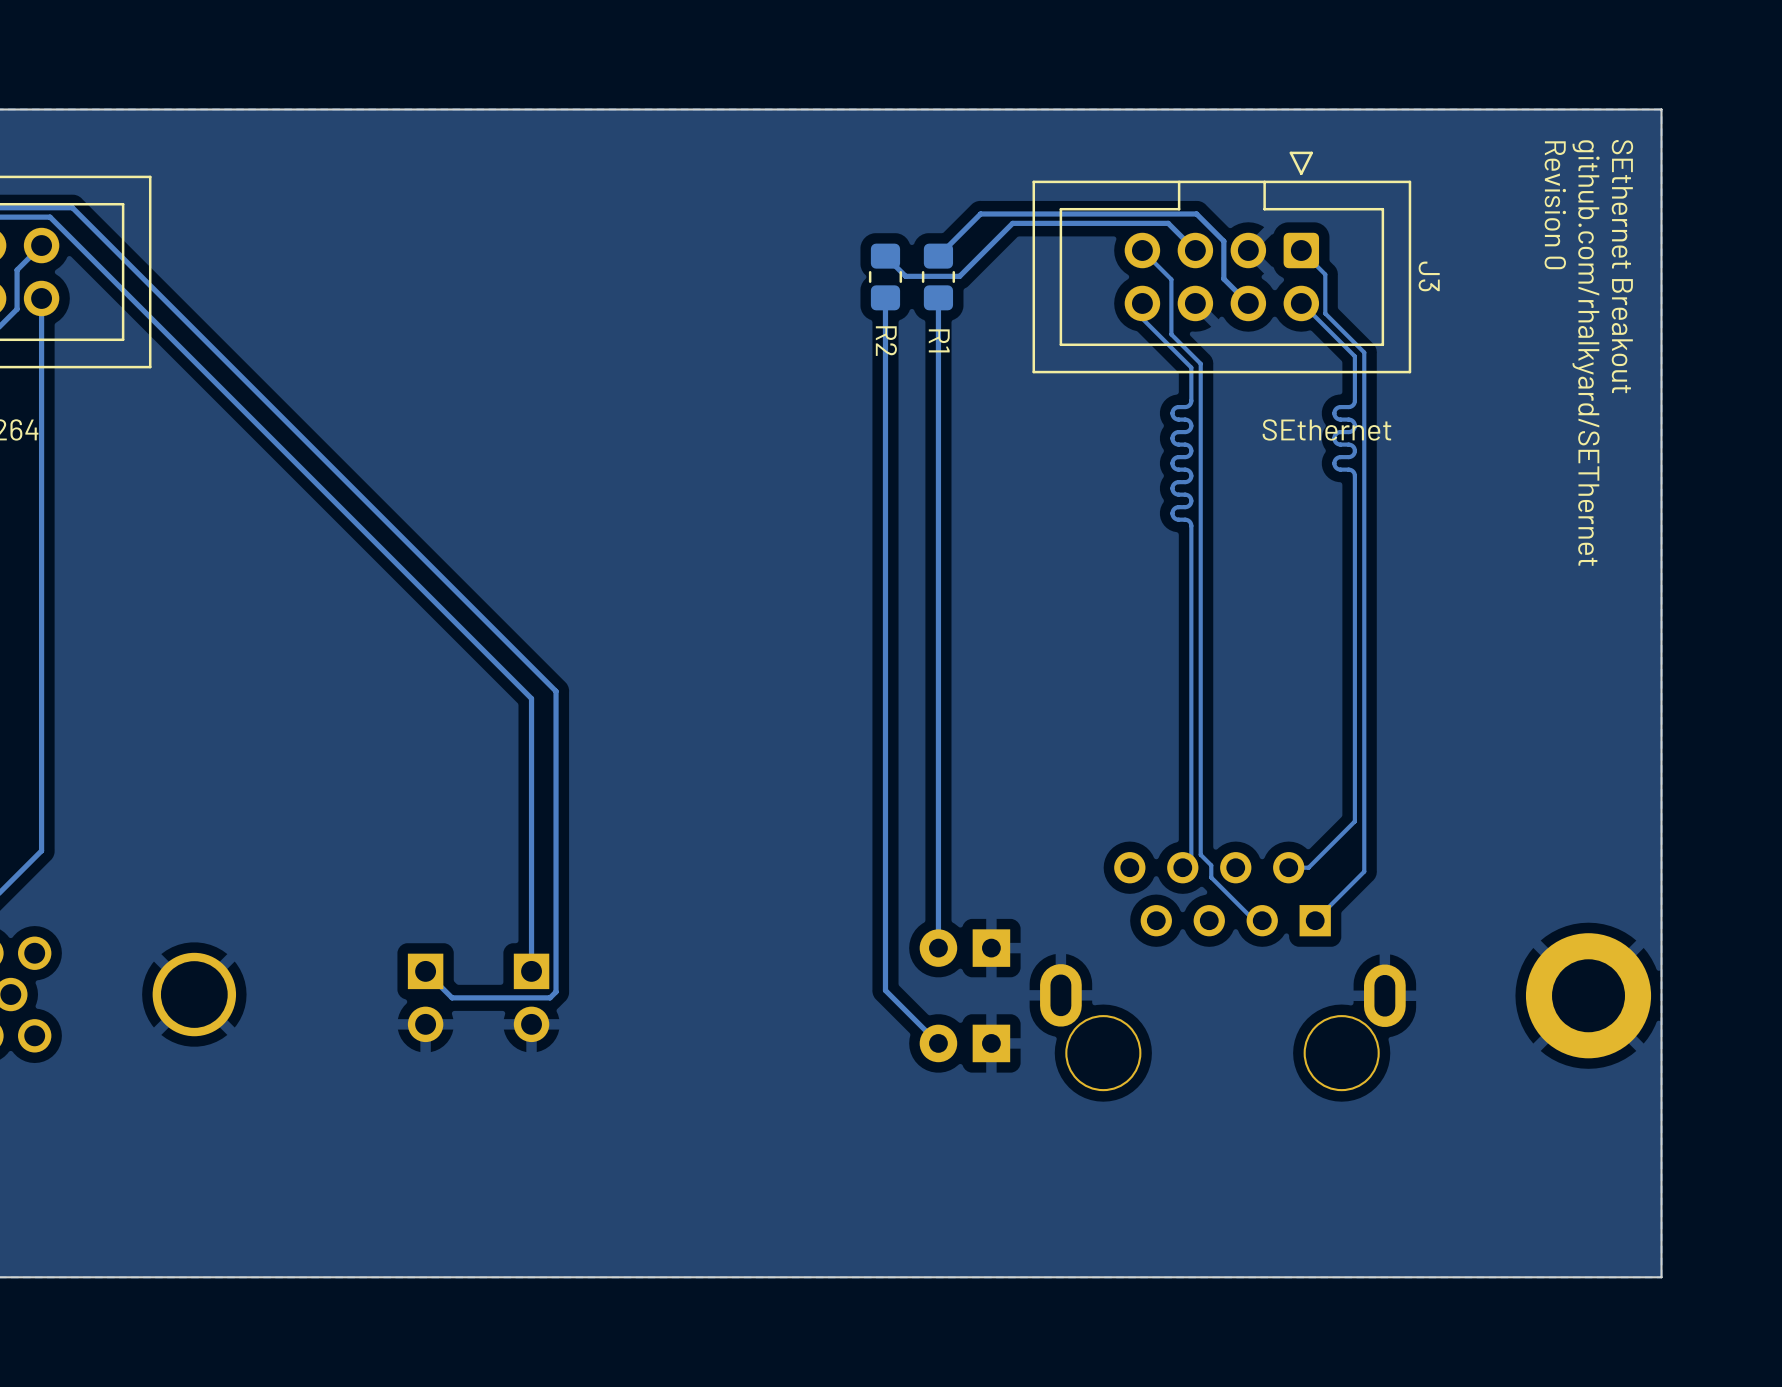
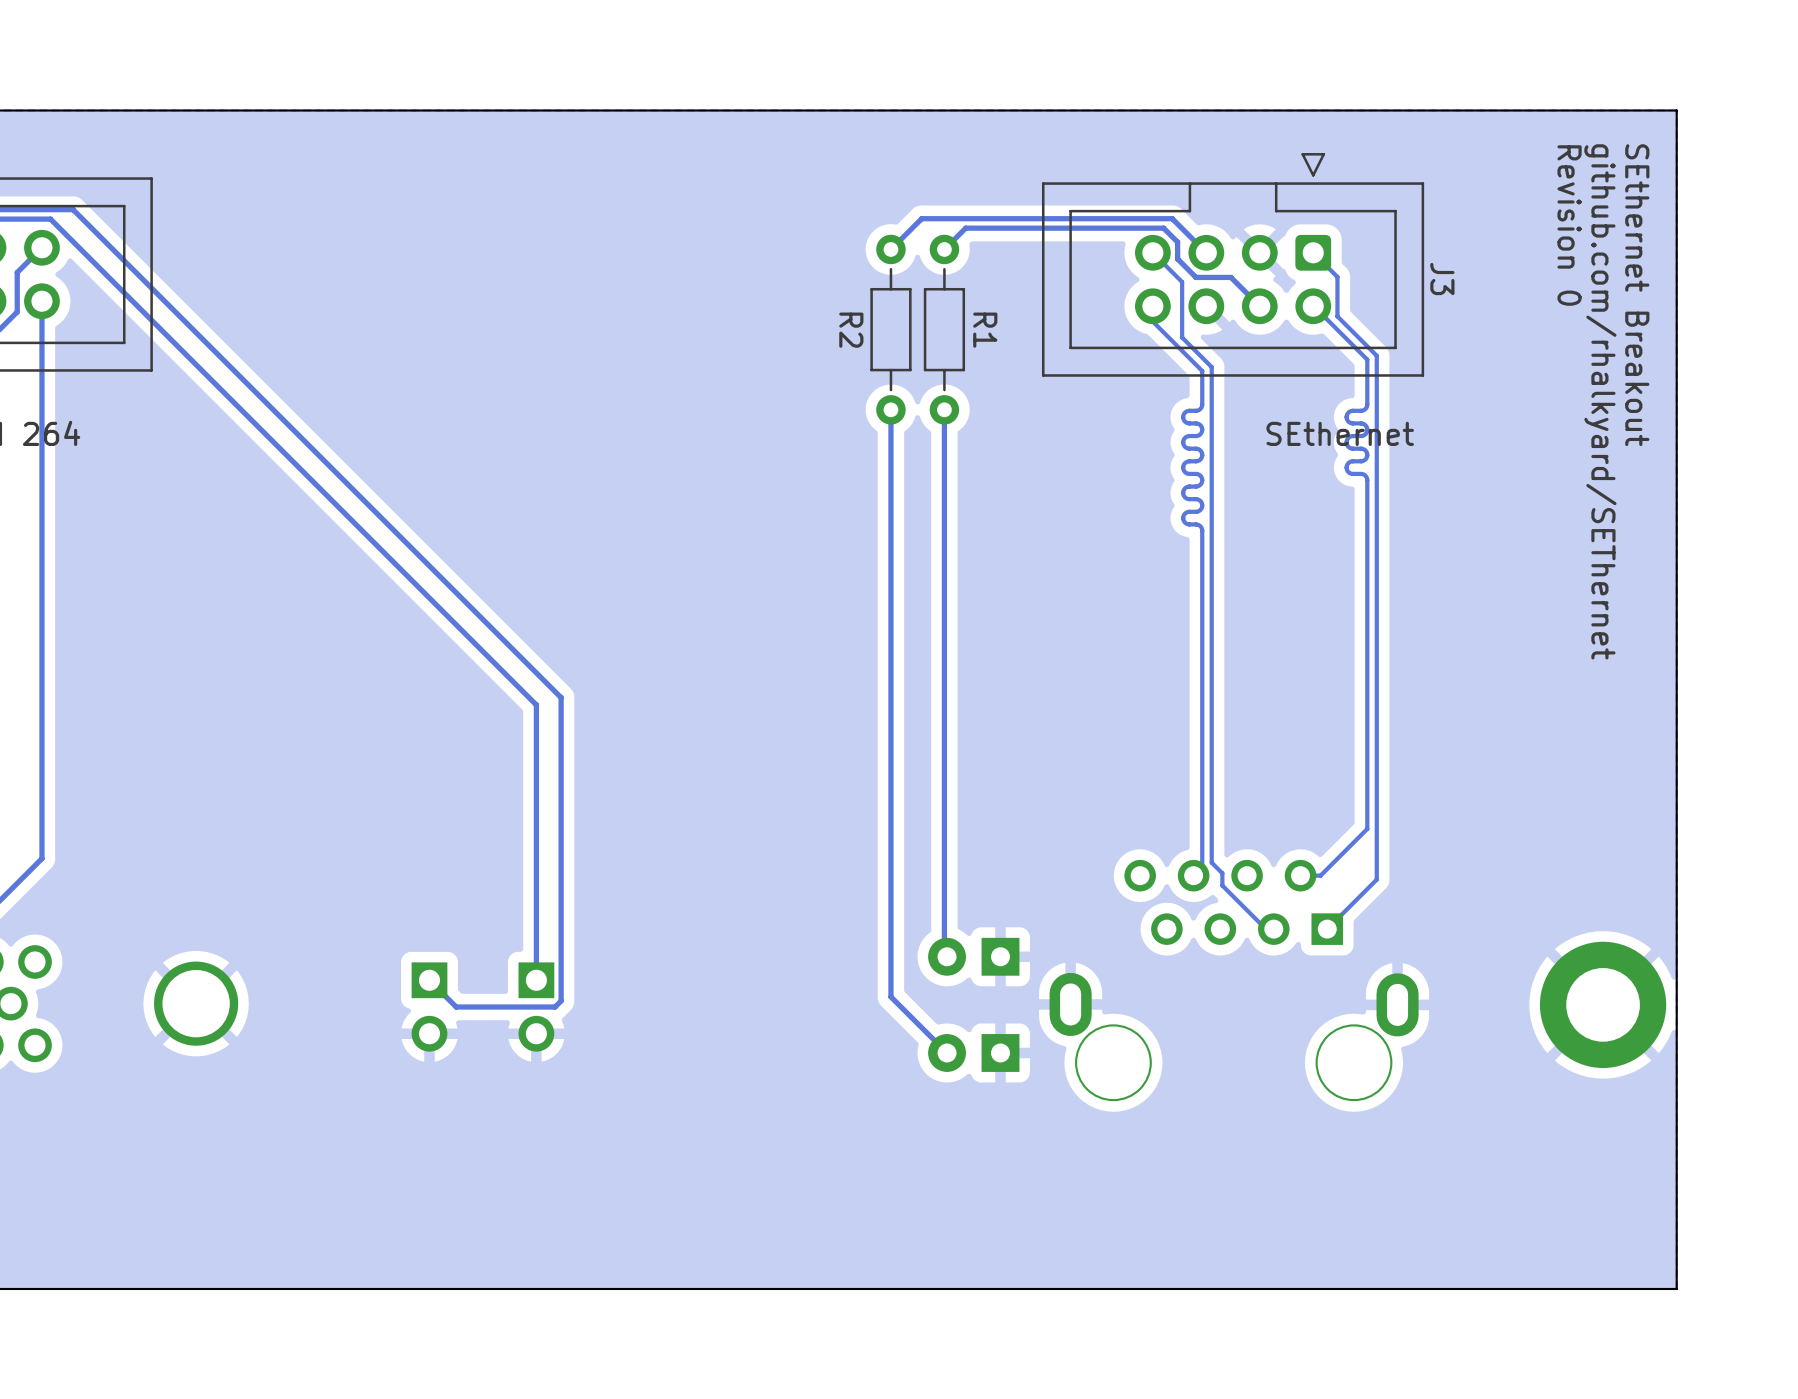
track: (1168, 223) (1012, 223) (959, 276) (905, 276) (885, 256) -> (1178, 225) (1172, 218) (921, 218) (890, 249)
R2 footprint: [868, 243, 903, 311] -> [870, 234, 912, 425]
R1 footprint: [921, 243, 956, 311] -> [923, 234, 966, 425]
track: (938, 256) (980, 213) (1196, 213) (1223, 241) (1223, 278) -> (944, 249) (965, 228) (1163, 228) (1177, 242) (1177, 259) (1196, 277) (1230, 277) (1235, 281)
track: (885, 297) (885, 990) -> (890, 409) (890, 996) (893, 999)
track: (938, 297) (938, 948) -> (944, 409) (944, 954) (947, 956)
R1 name position: R1 (939, 340) -> R1 (985, 330)
R2 name position: R2 (886, 341) -> R2 (851, 330)

